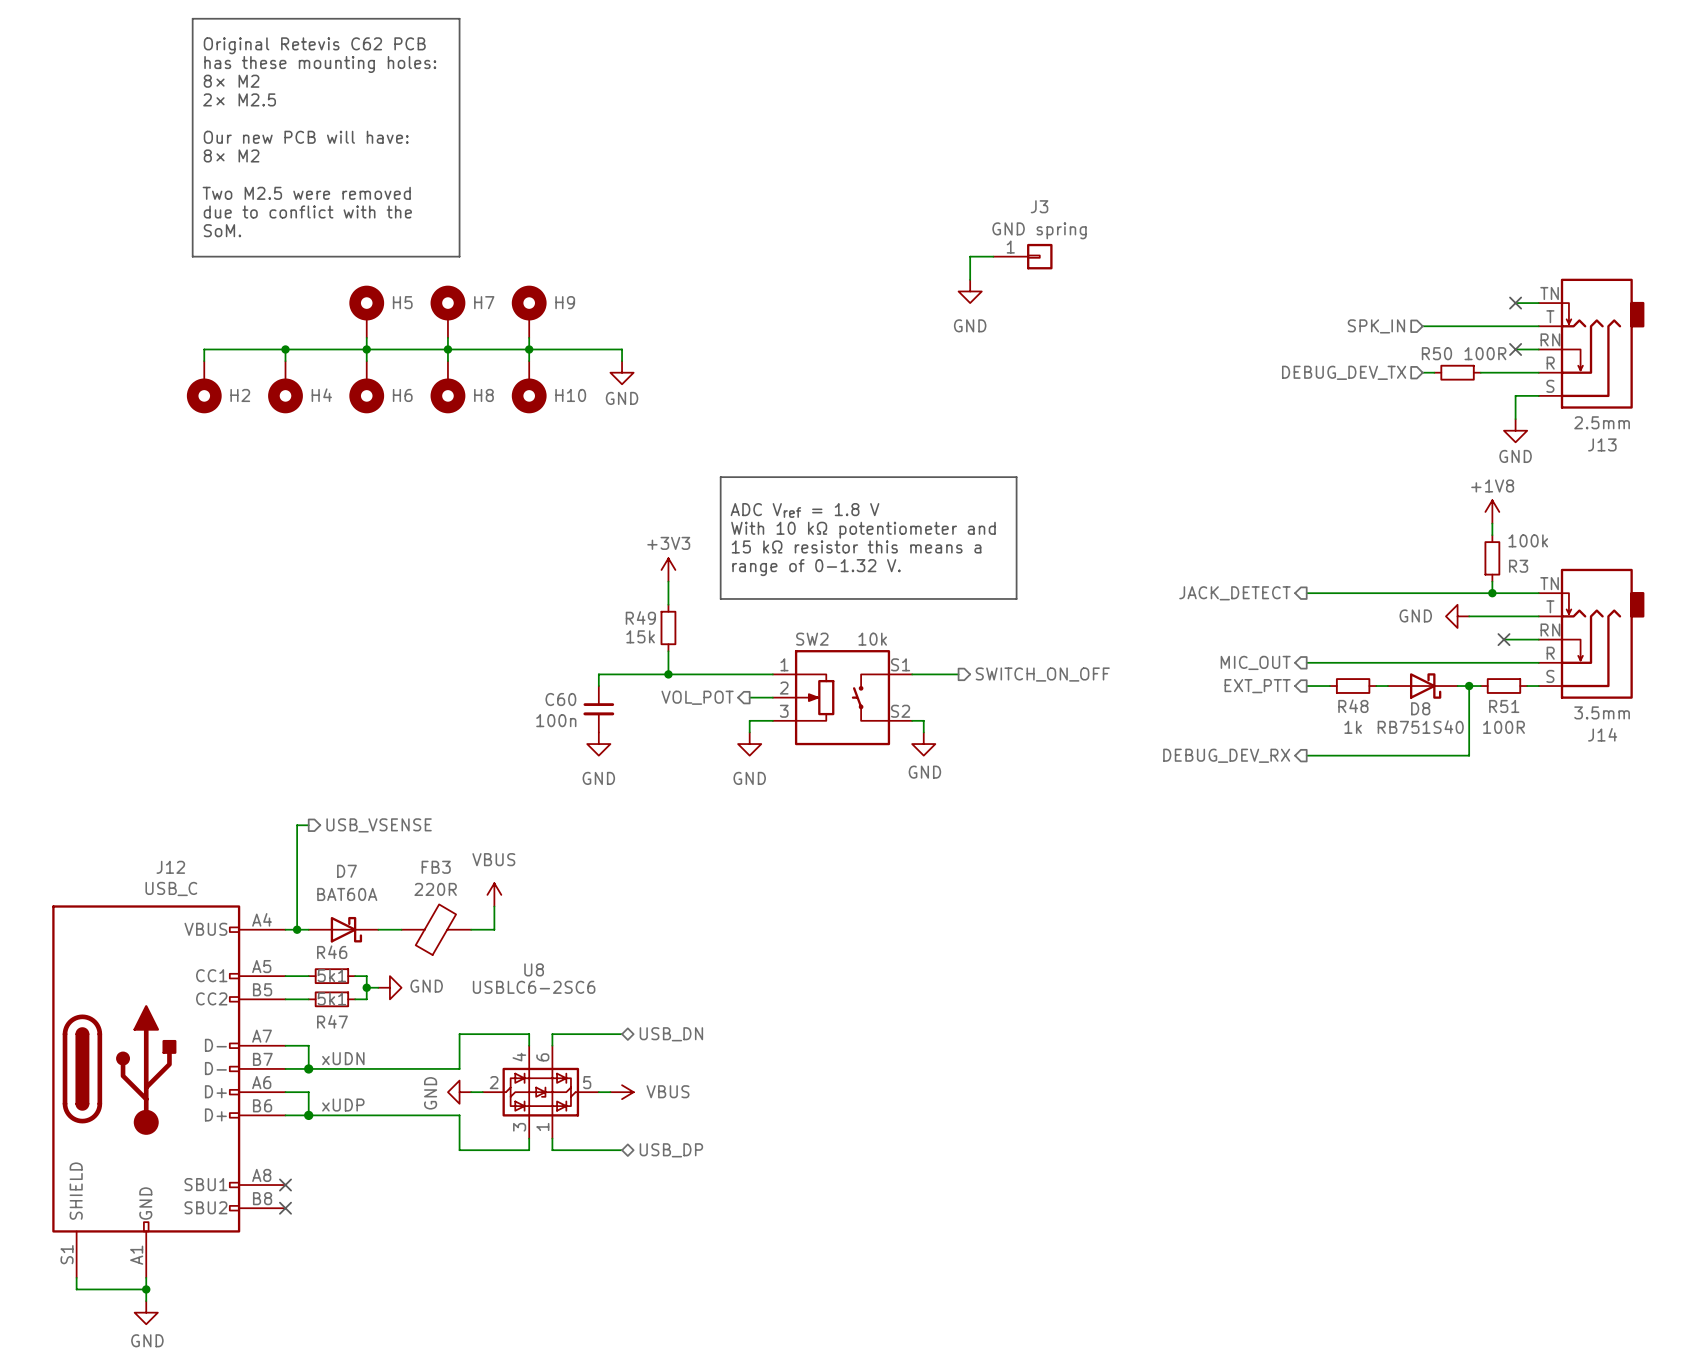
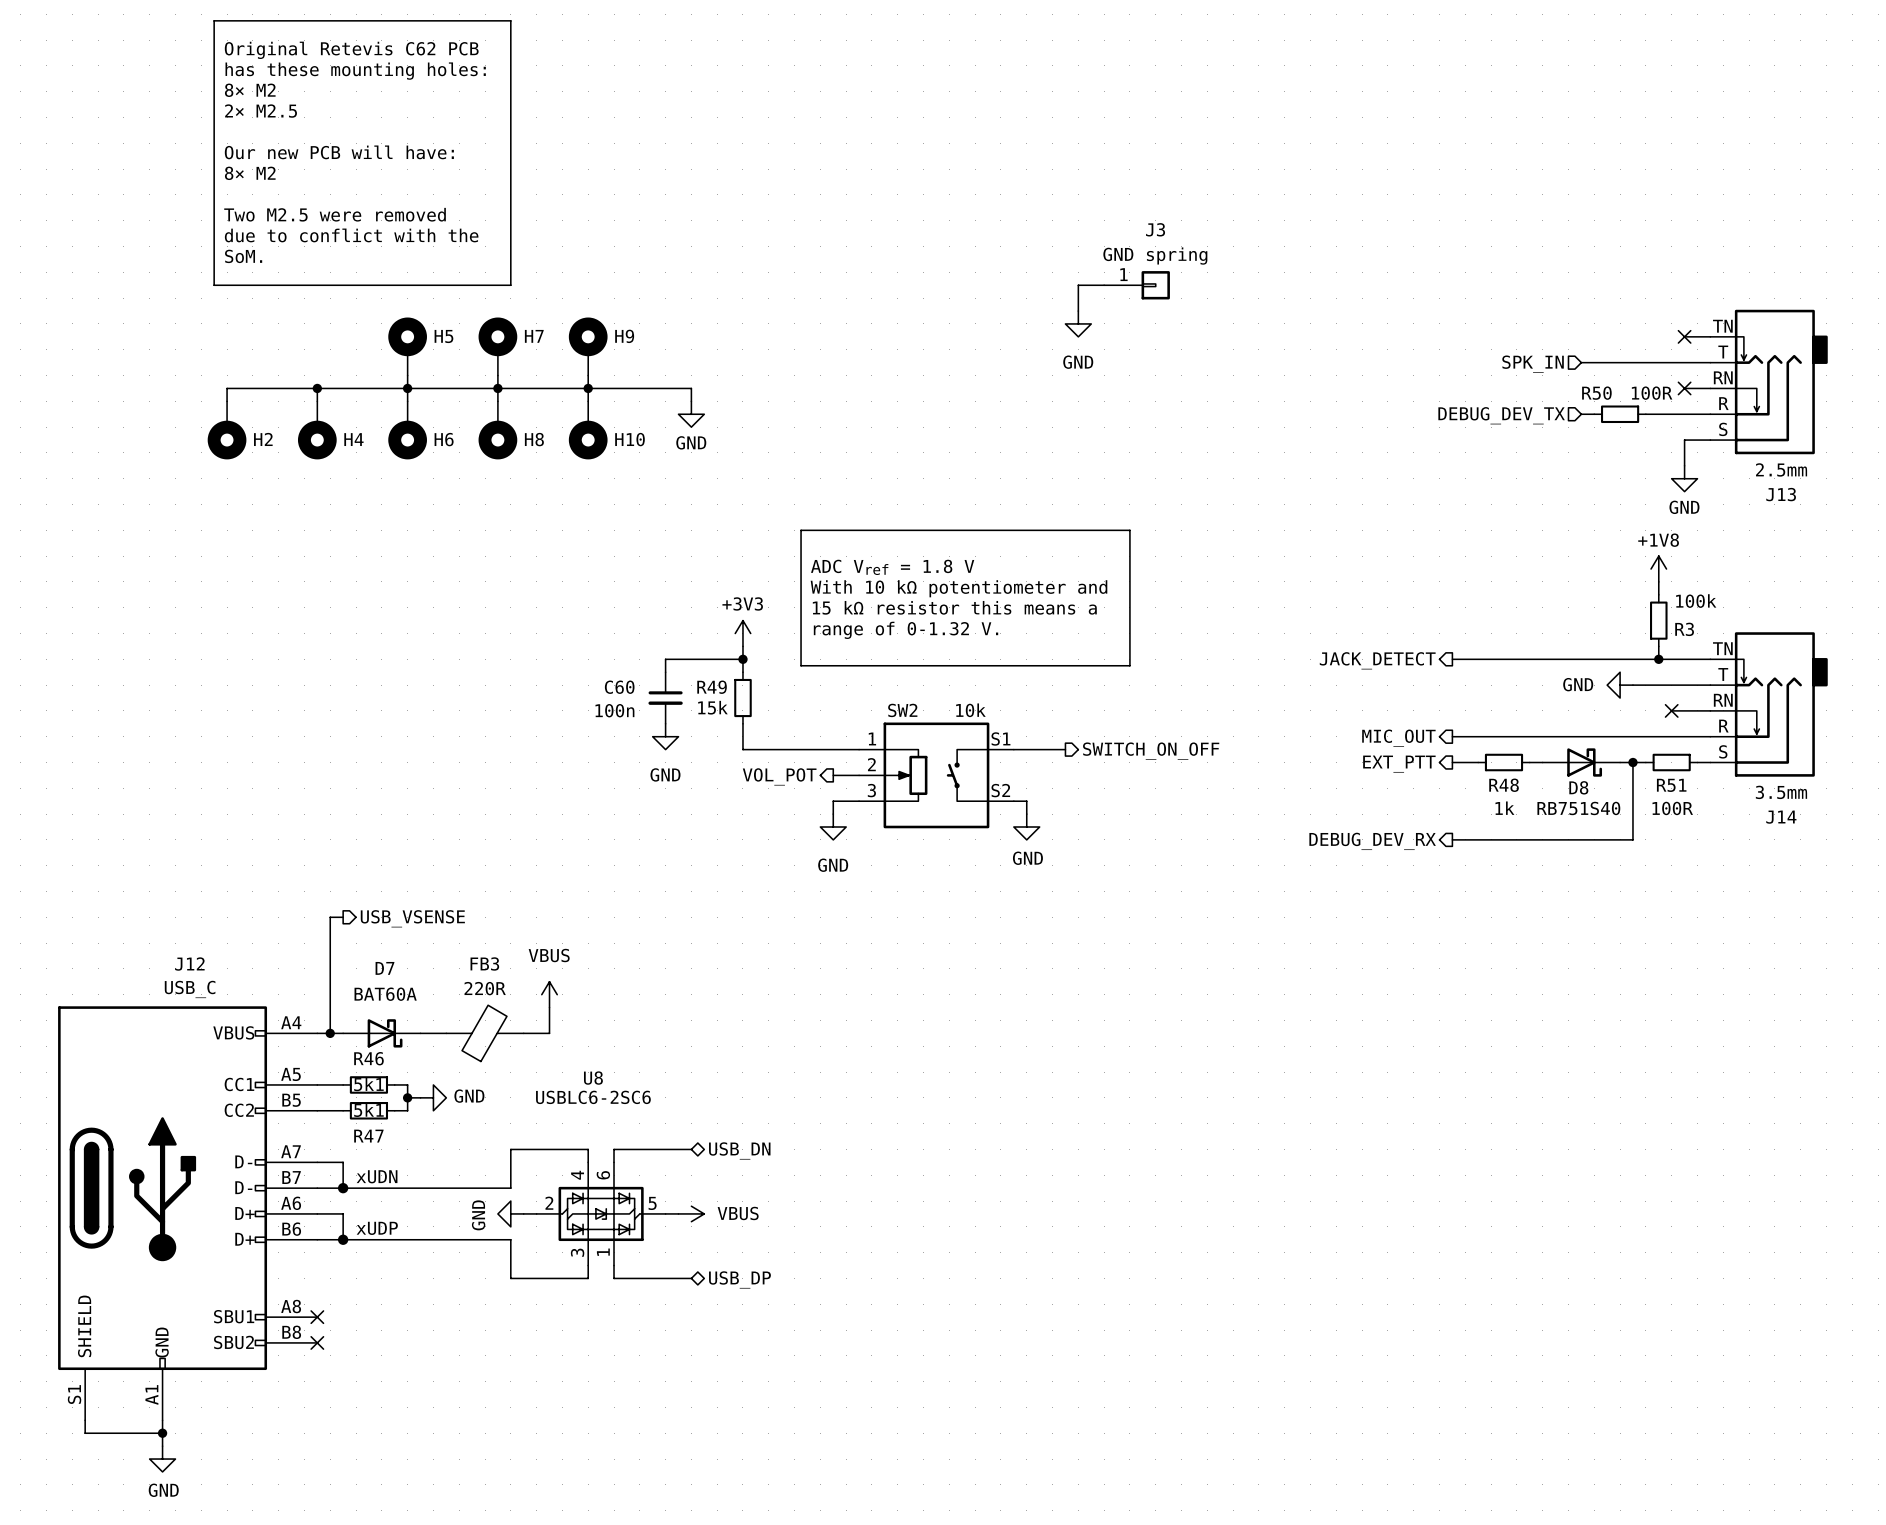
junction: none -> (742, 659)
wire: (668, 674) (598, 674) (598, 686) -> (742, 659) (665, 659) (665, 672)
junction: (668, 674) -> none
C60 position: (598, 709) -> (665, 698)
power symbol position: GND (598, 744) -> GND (665, 736)

